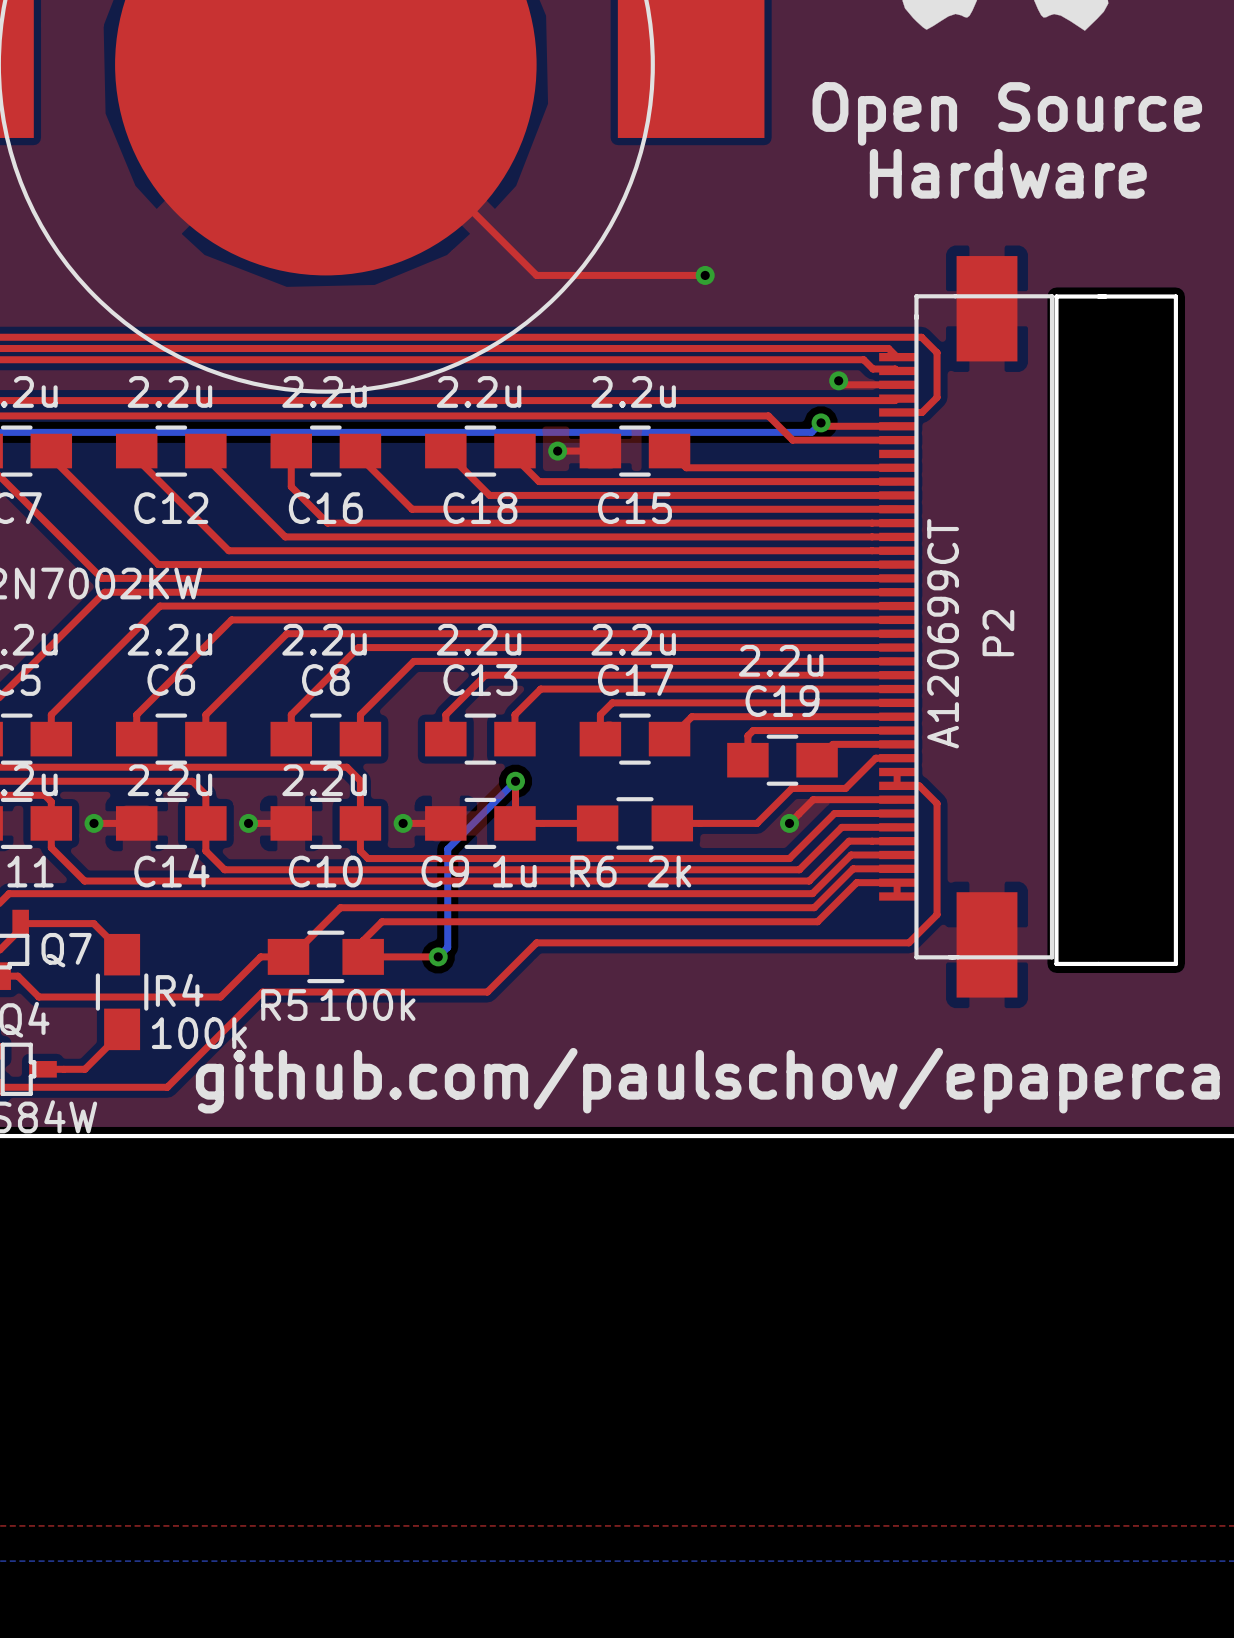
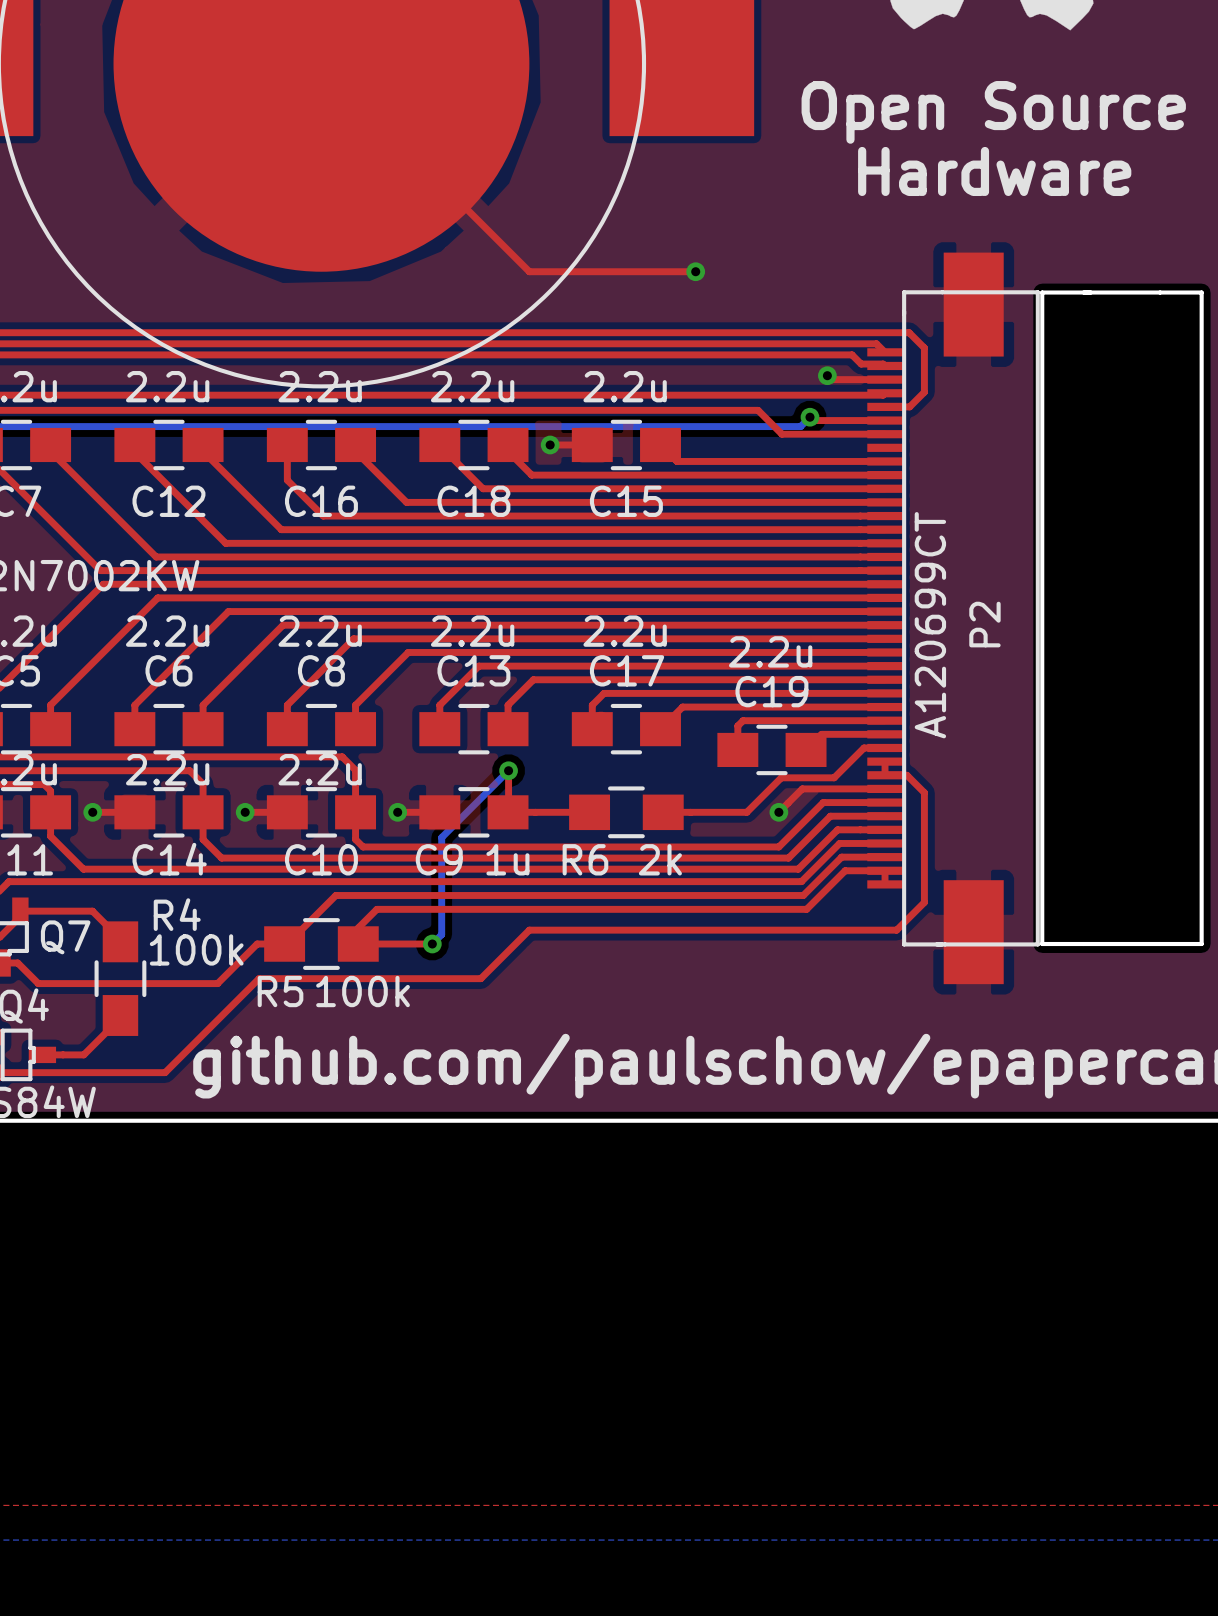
board edge: (1175, 296) (1175, 963) (1056, 963) (1056, 956) -> (1160, 292) (1201, 292) (1201, 944) (1042, 944)
R4 name position: R4 (179, 990) -> R4 (177, 914)
R4 value position: 100k (199, 1033) -> 100k (196, 949)

